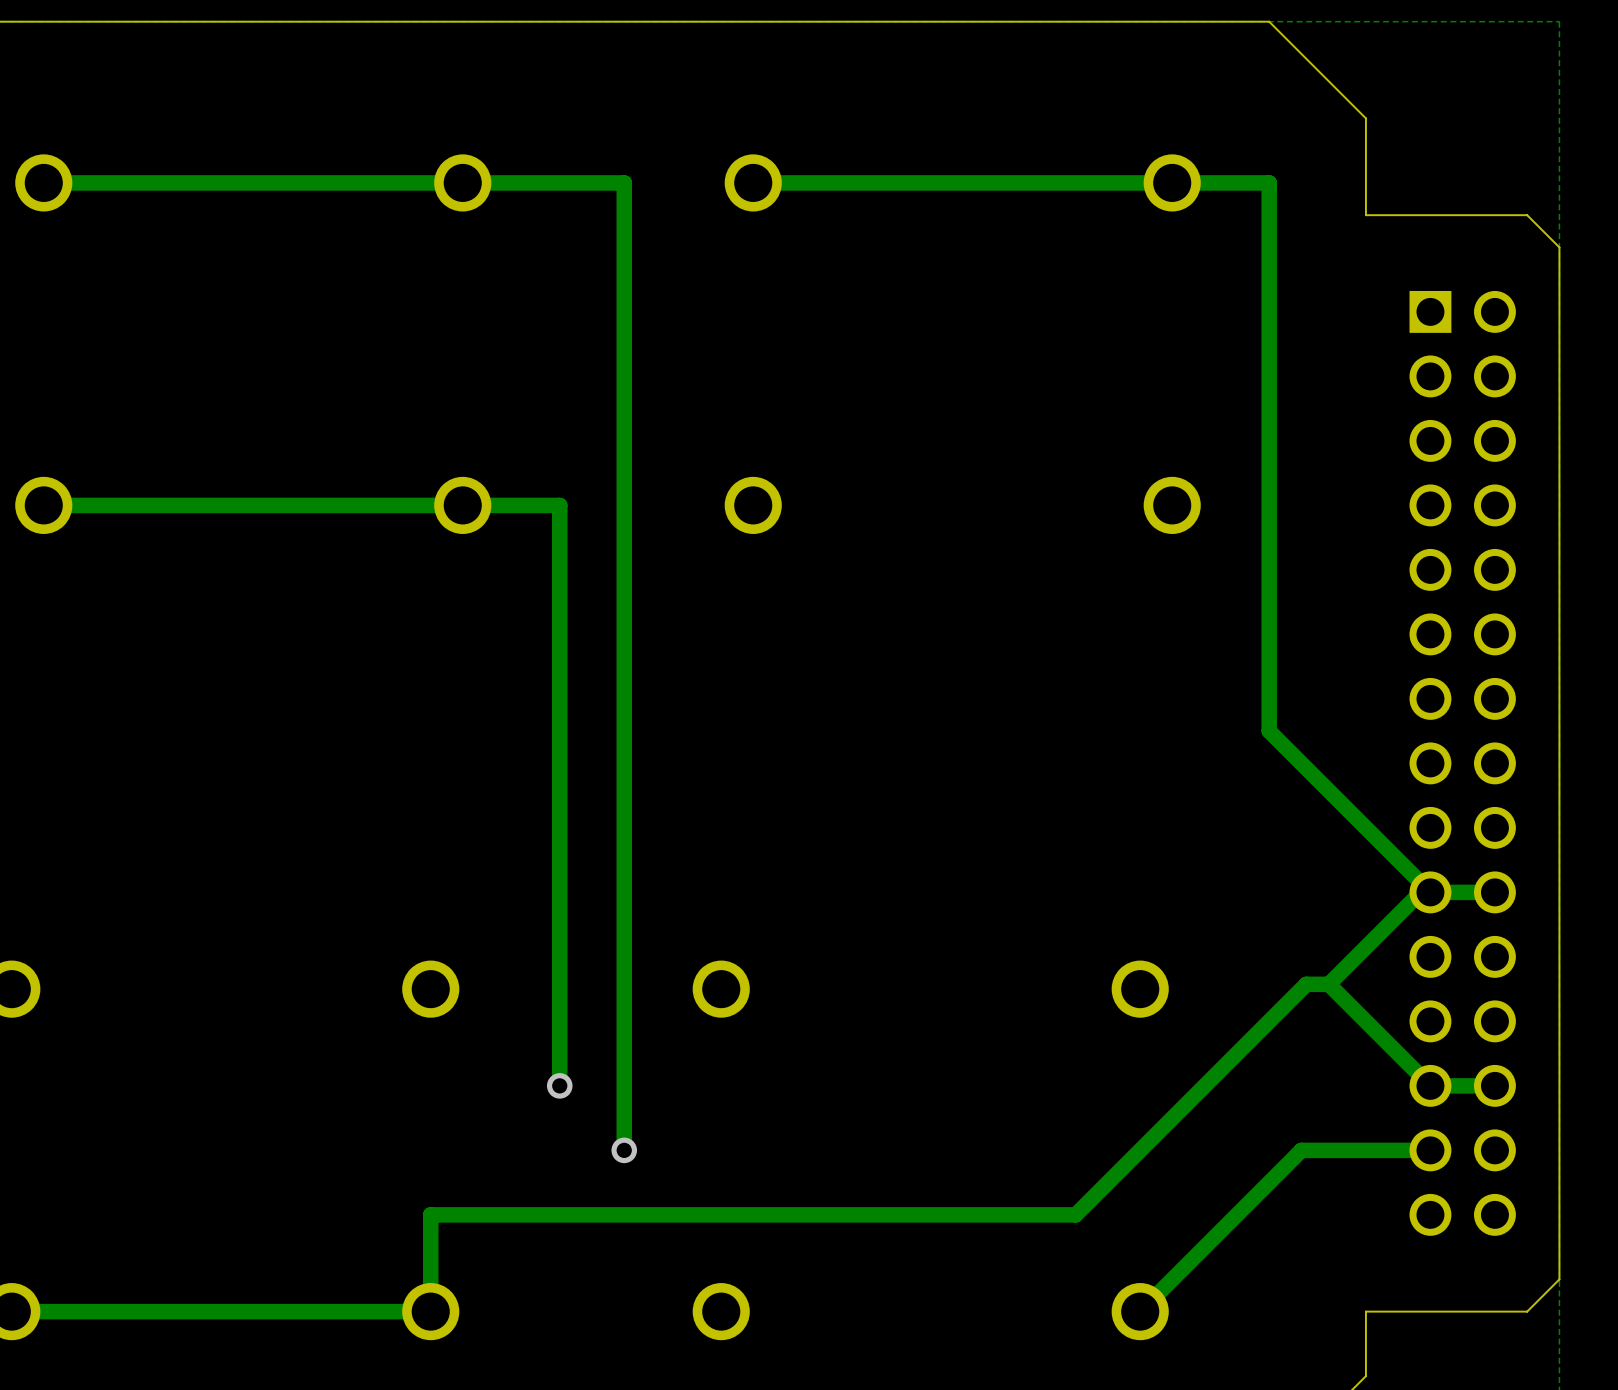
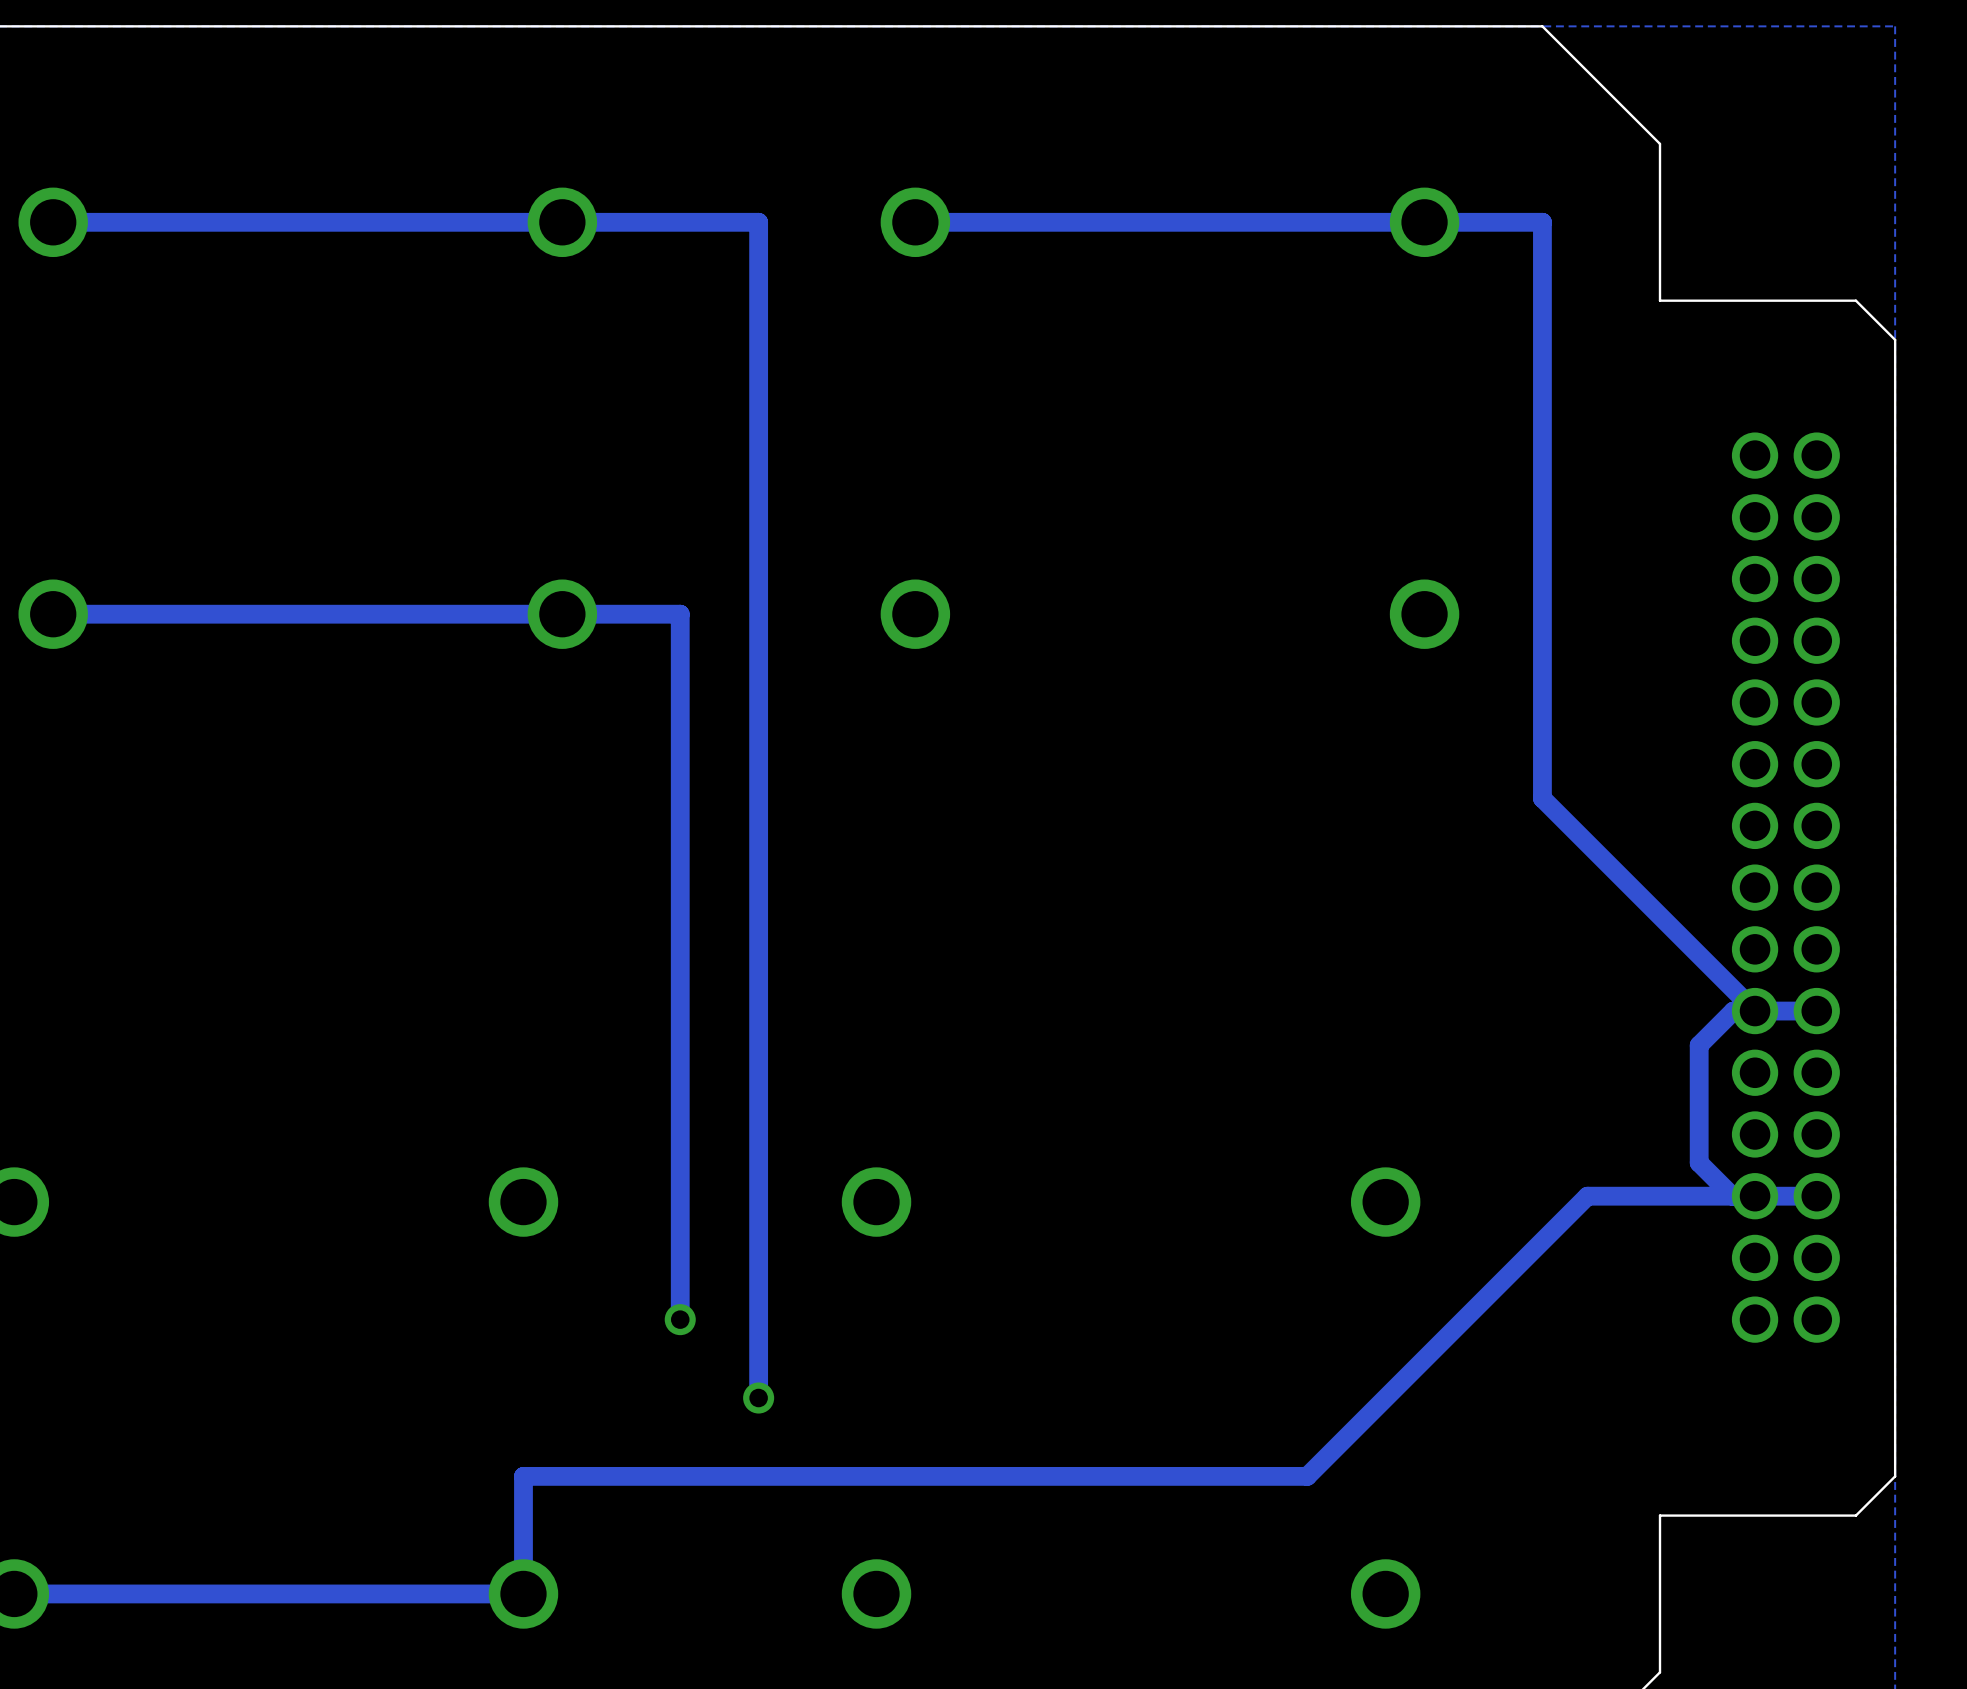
board edge: (1365, 215) (1527, 215) (1559, 247) (1559, 279) -> (1660, 261) (1660, 300) (1855, 300) (1895, 339)
track: (1269, 657) (1269, 731) (1430, 892) -> (1542, 798) (1755, 1011)
part: none -> (1785, 887)
part: (1462, 763) -> none
track: none -> (1816, 1011) (1733, 1011) (1699, 1045) (1699, 1162) (1732, 1196)
track: (1494, 892) (1420, 892) (1328, 984) (1430, 1085) (1494, 1085) -> none
track: none -> (1816, 1196) (1614, 1196)
track: (1430, 1150) (1301, 1150) (1140, 1311) -> none
board edge: (1559, 1214) (1559, 1279) (1527, 1311) (1365, 1311) -> (1895, 1476) (1855, 1515) (1660, 1515) (1660, 1593)

